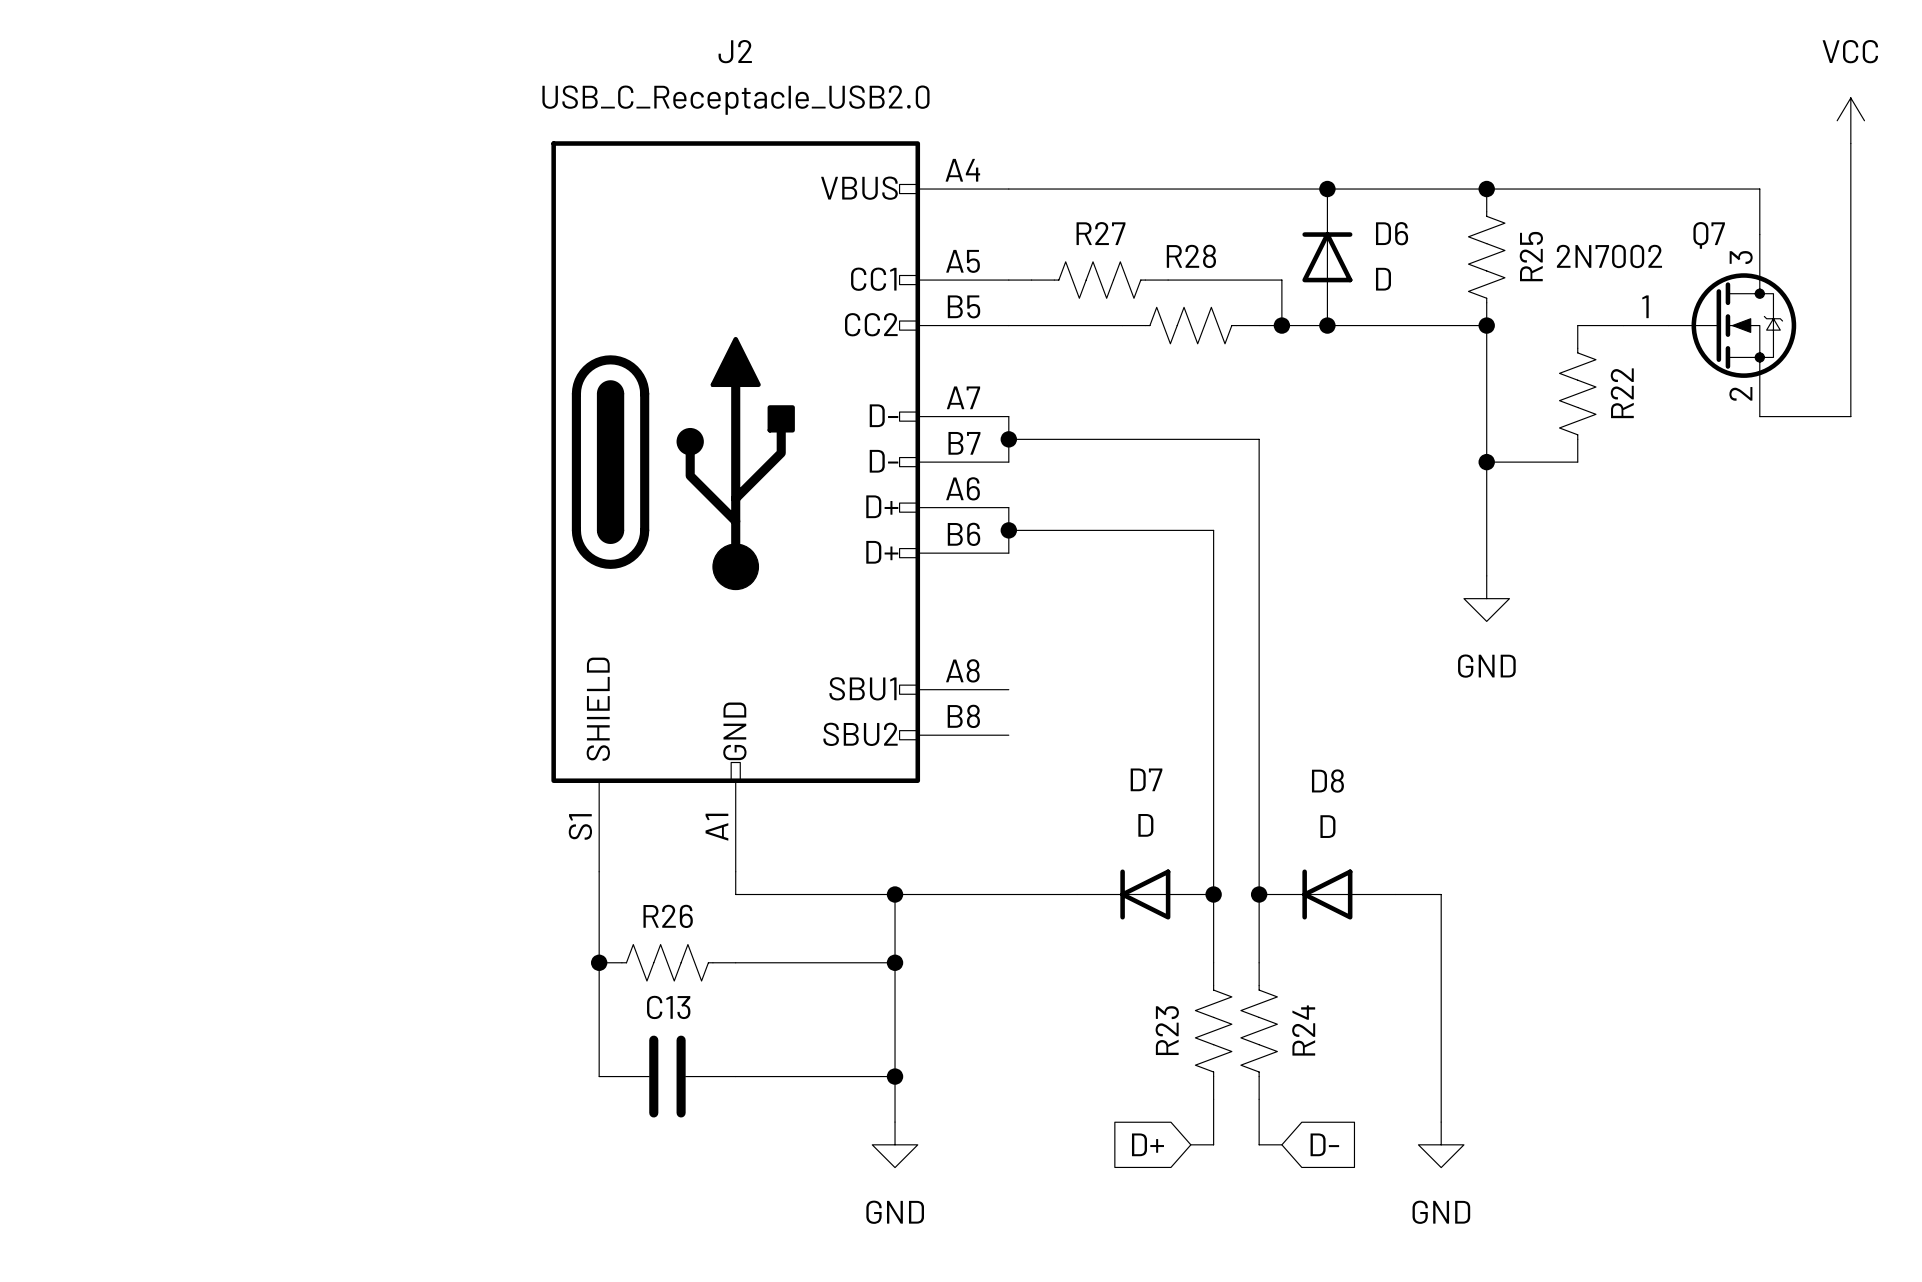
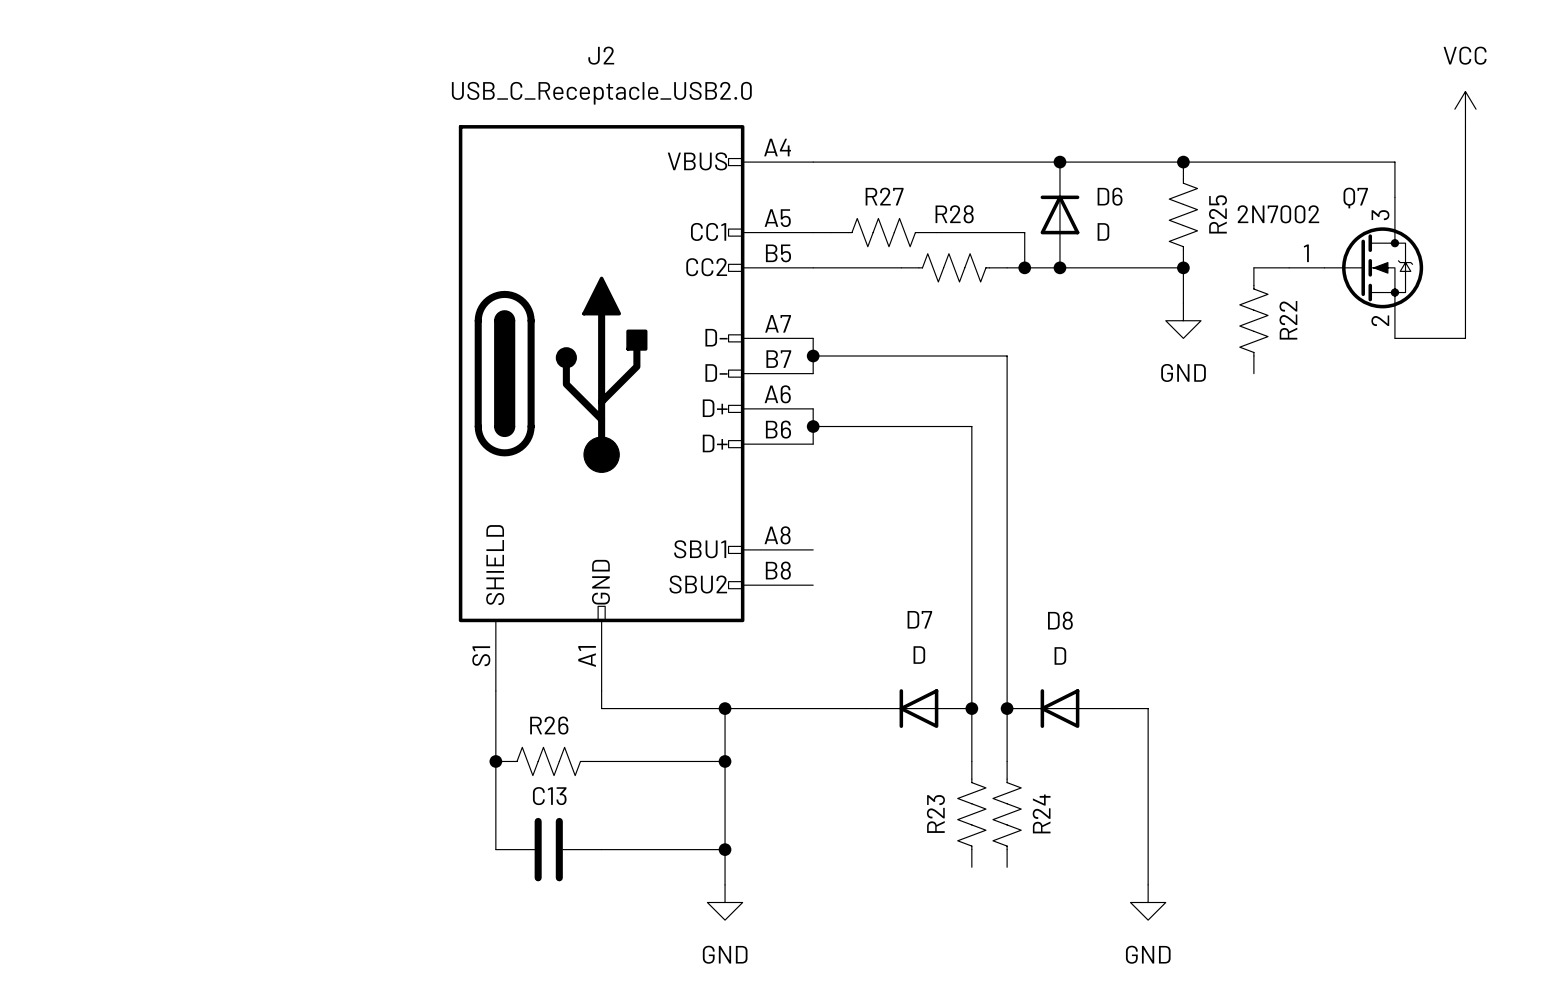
wire: (1486, 371) (1486, 575) -> none
wire: (1486, 462) (1577, 462) -> none
junction: (1486, 462) -> none
power symbol position: GND (1486, 598) -> GND (1183, 320)
wire: (1213, 1099) (1213, 1144) (1190, 1144) -> none
wire: (1259, 1099) (1259, 1144) (1281, 1144) -> none
global label: D+ (1147, 1144) -> none
global label: D- (1324, 1144) -> none

